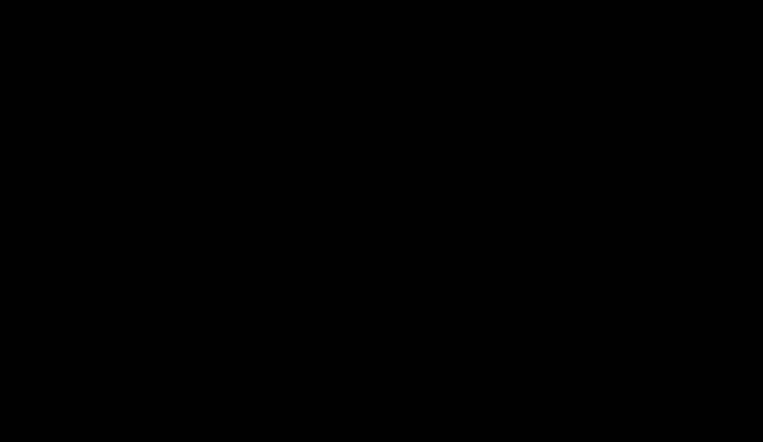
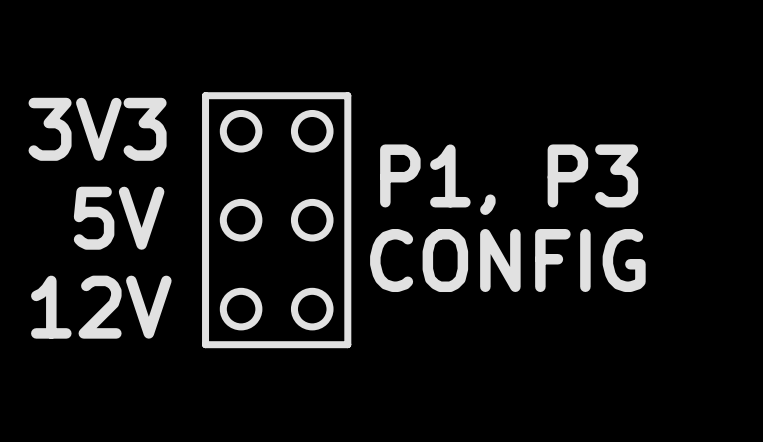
line: none -> (205, 95) (347, 95) (347, 344) (205, 344) (205, 95)
drawing: none -> [219, 109, 334, 153]
text: none -> 3V3 (97, 129)
text: none -> P1, P3 (509, 179)
drawing: none -> [219, 198, 334, 242]
text: none -> 5V (119, 218)
text: none -> CONFIG (507, 260)
drawing: none -> [219, 287, 334, 331]
text: none -> 12V (101, 307)

